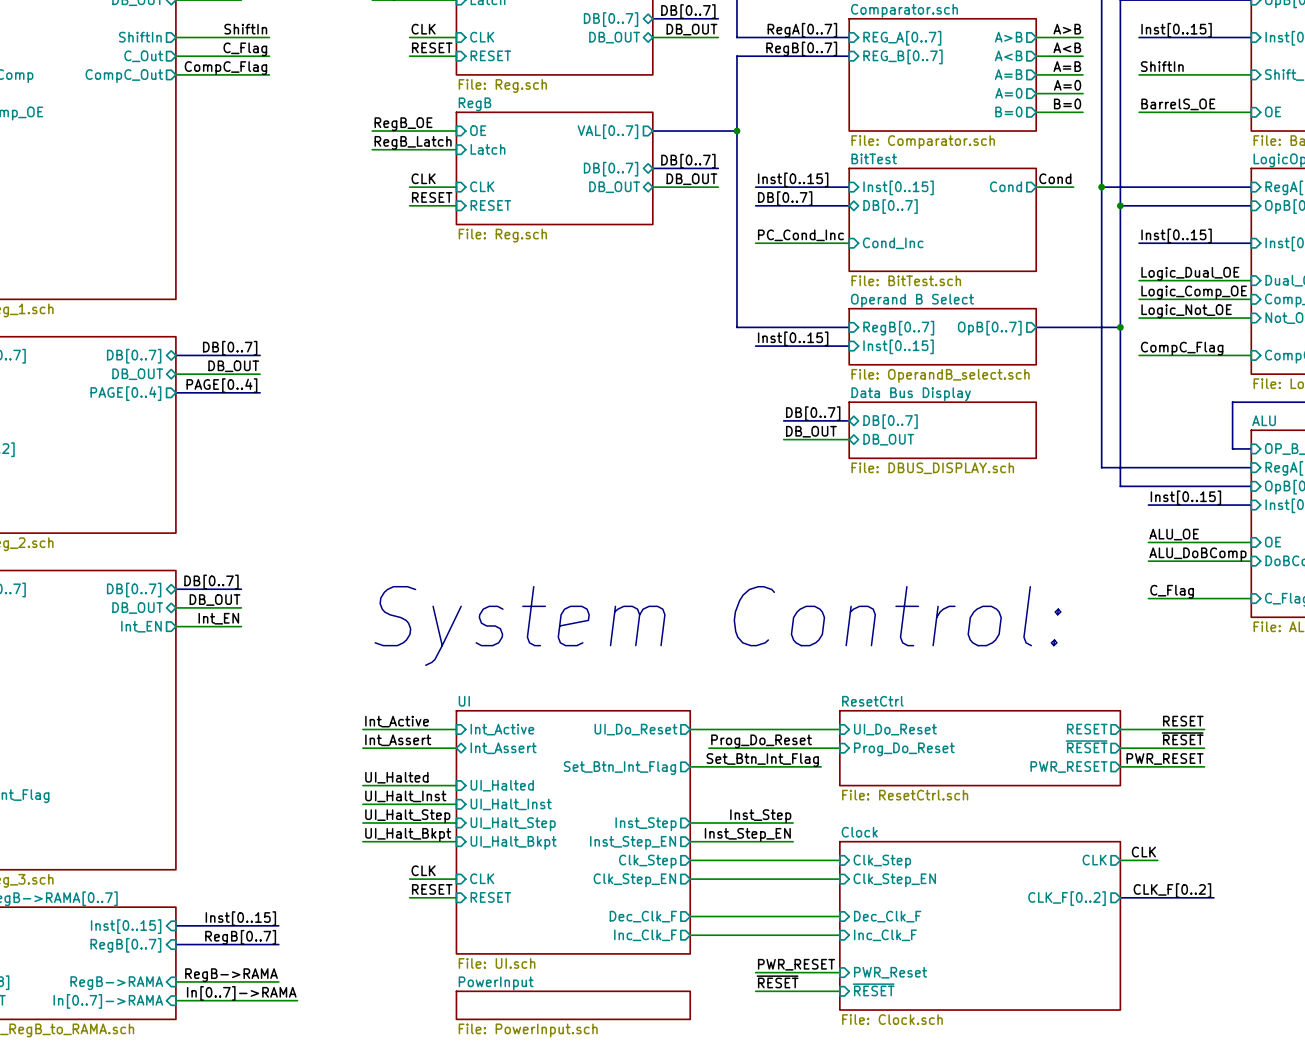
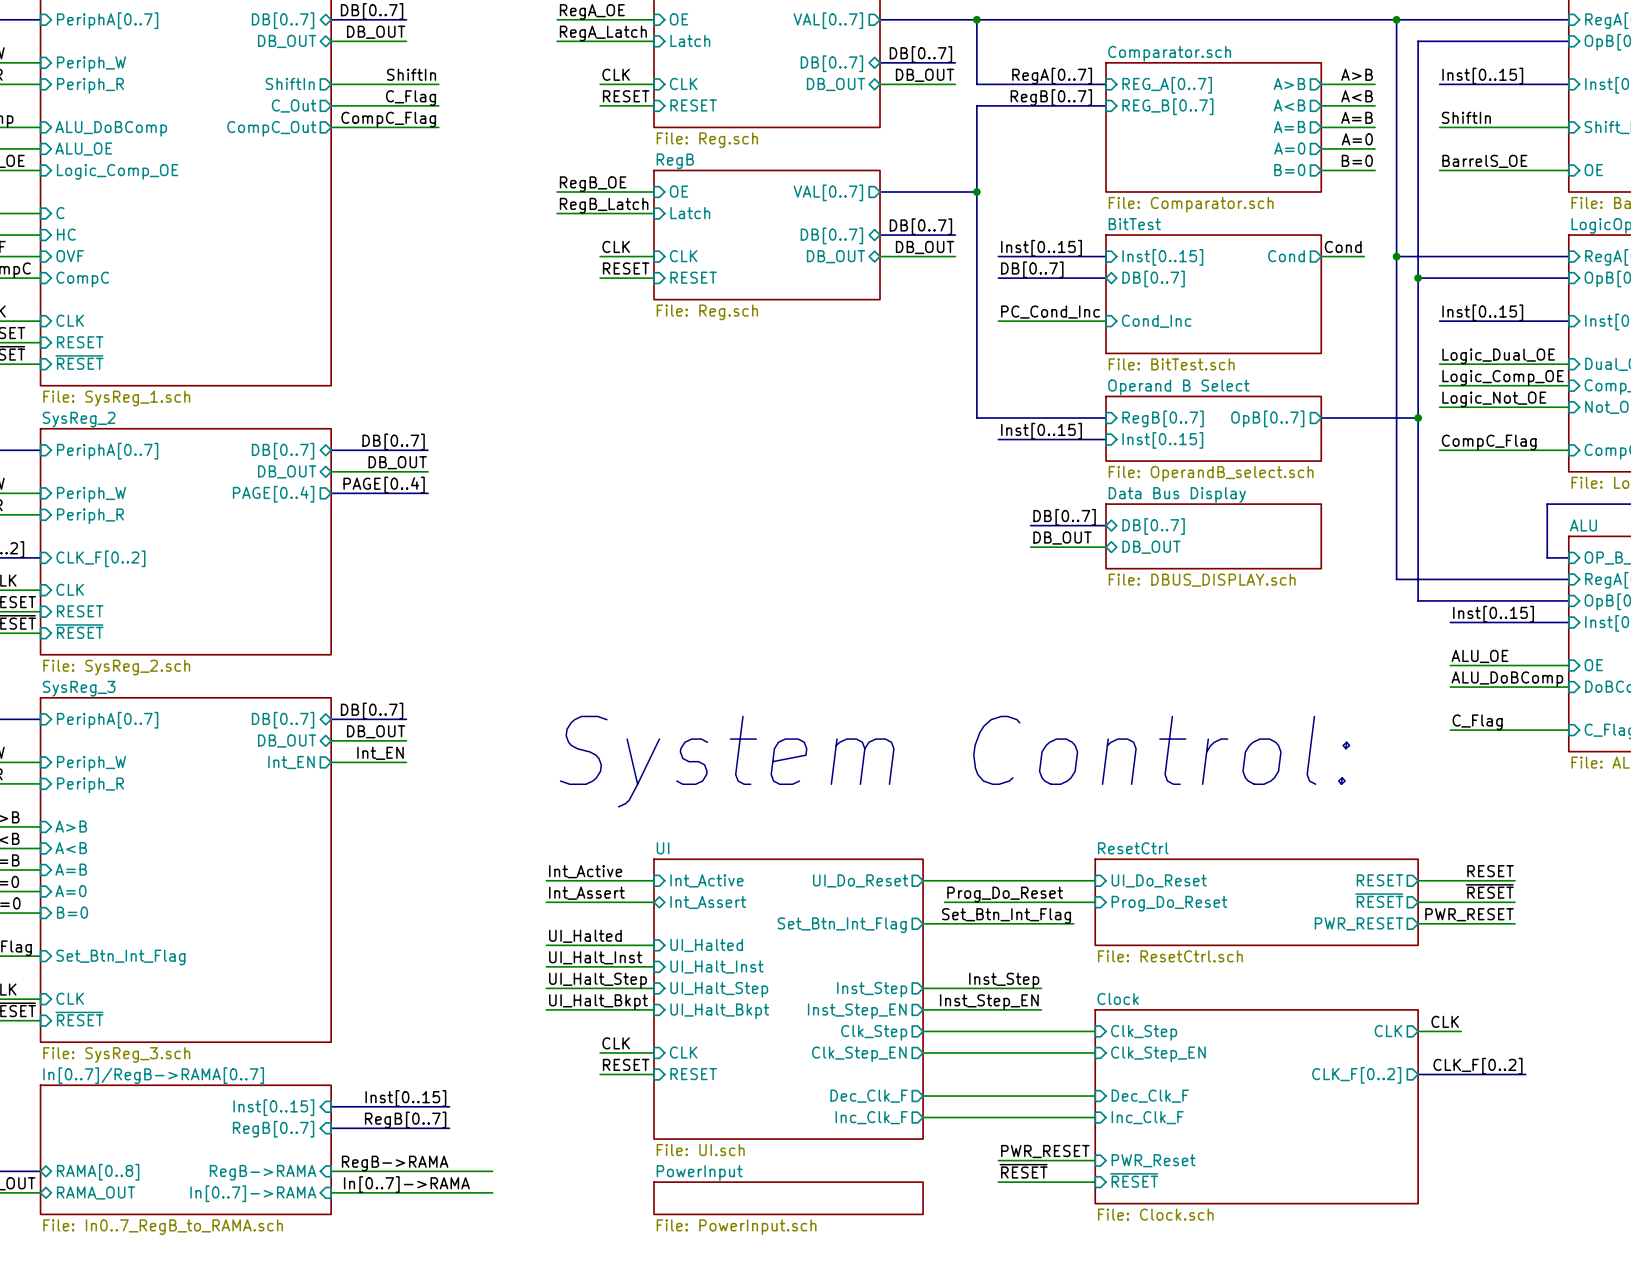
wire: none -> (449, 1171) (492, 1171)
wire: none -> (471, 1192) (492, 1192)

